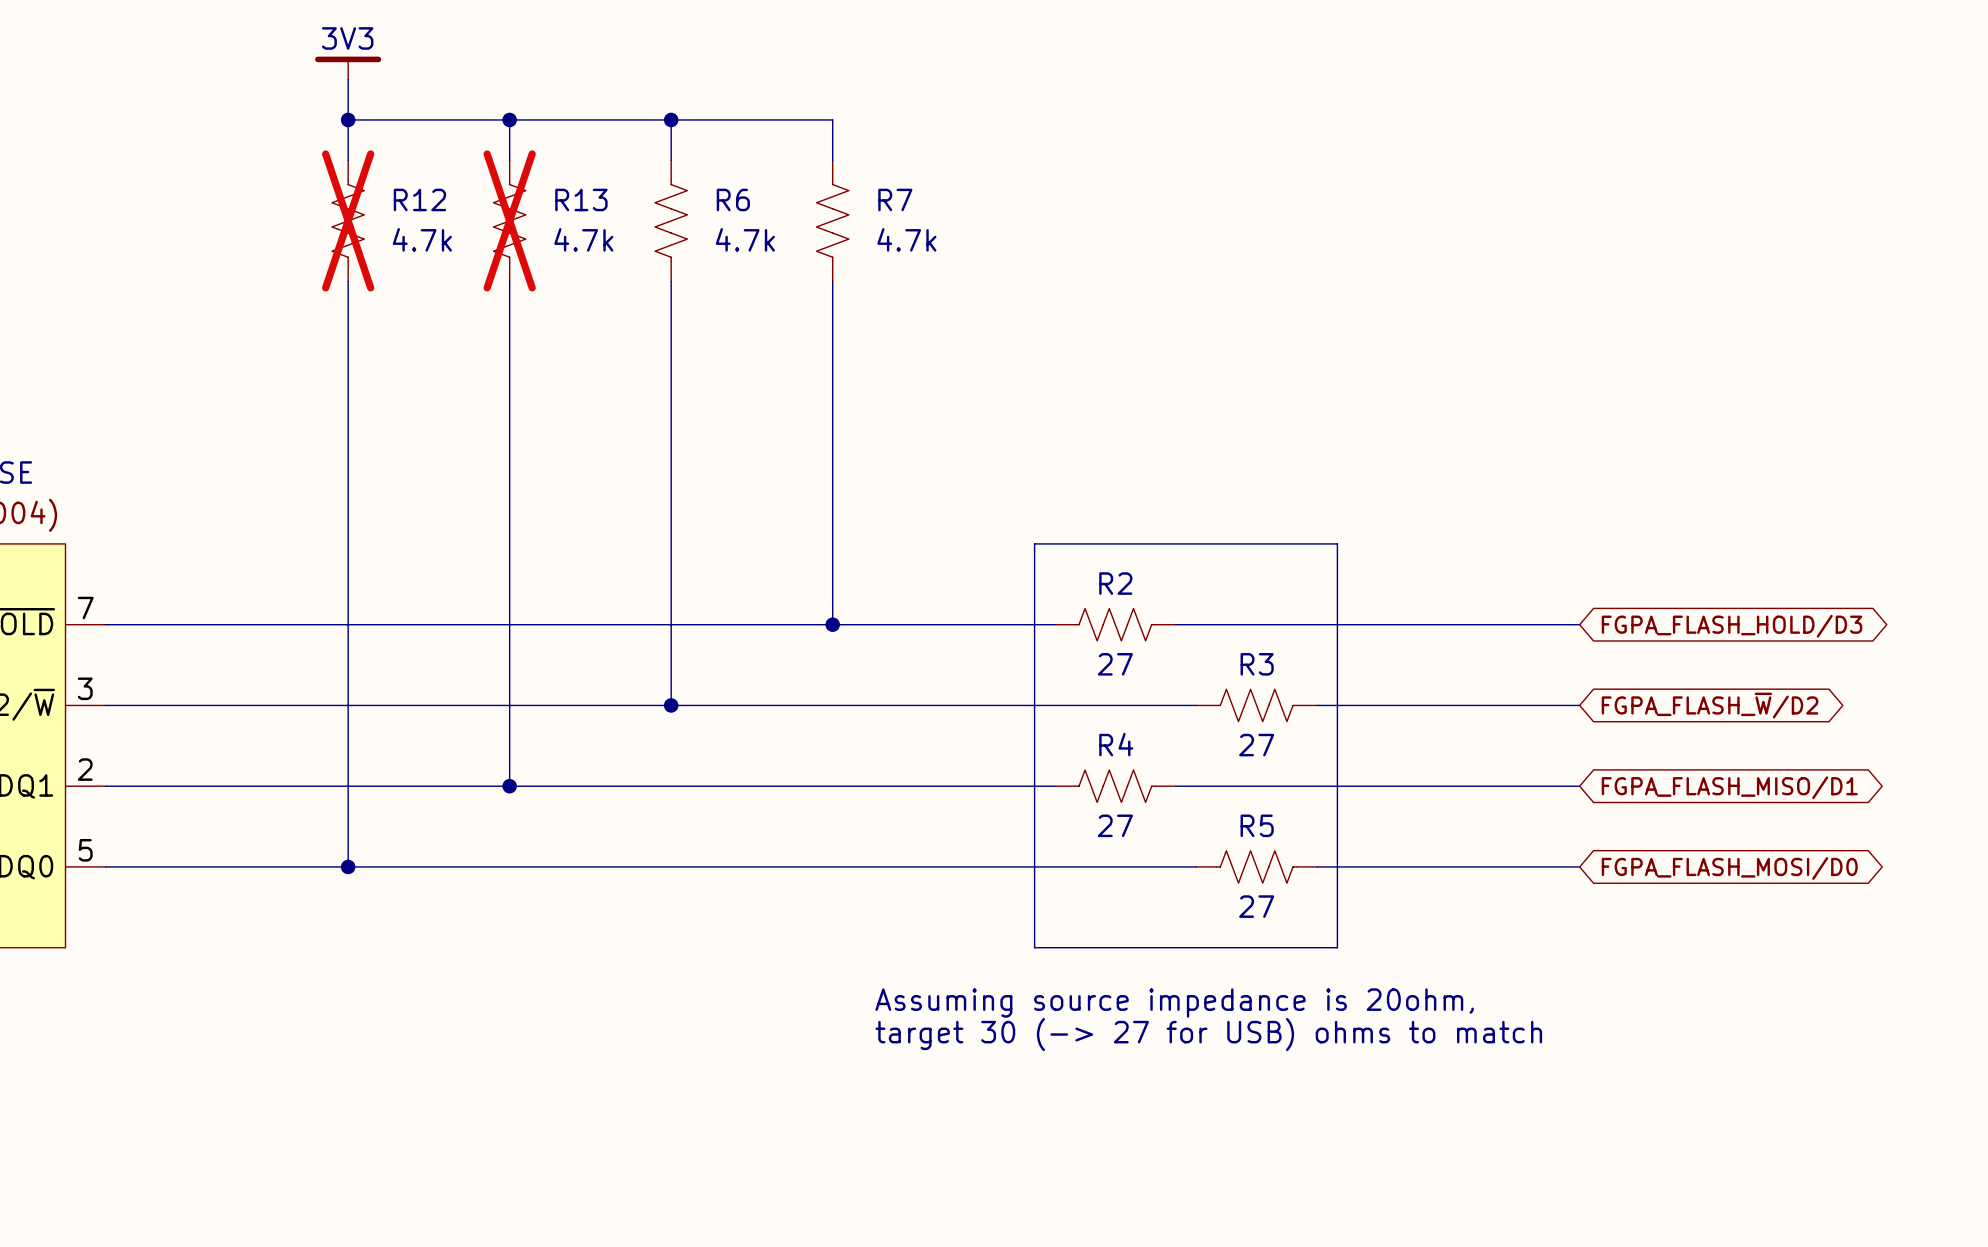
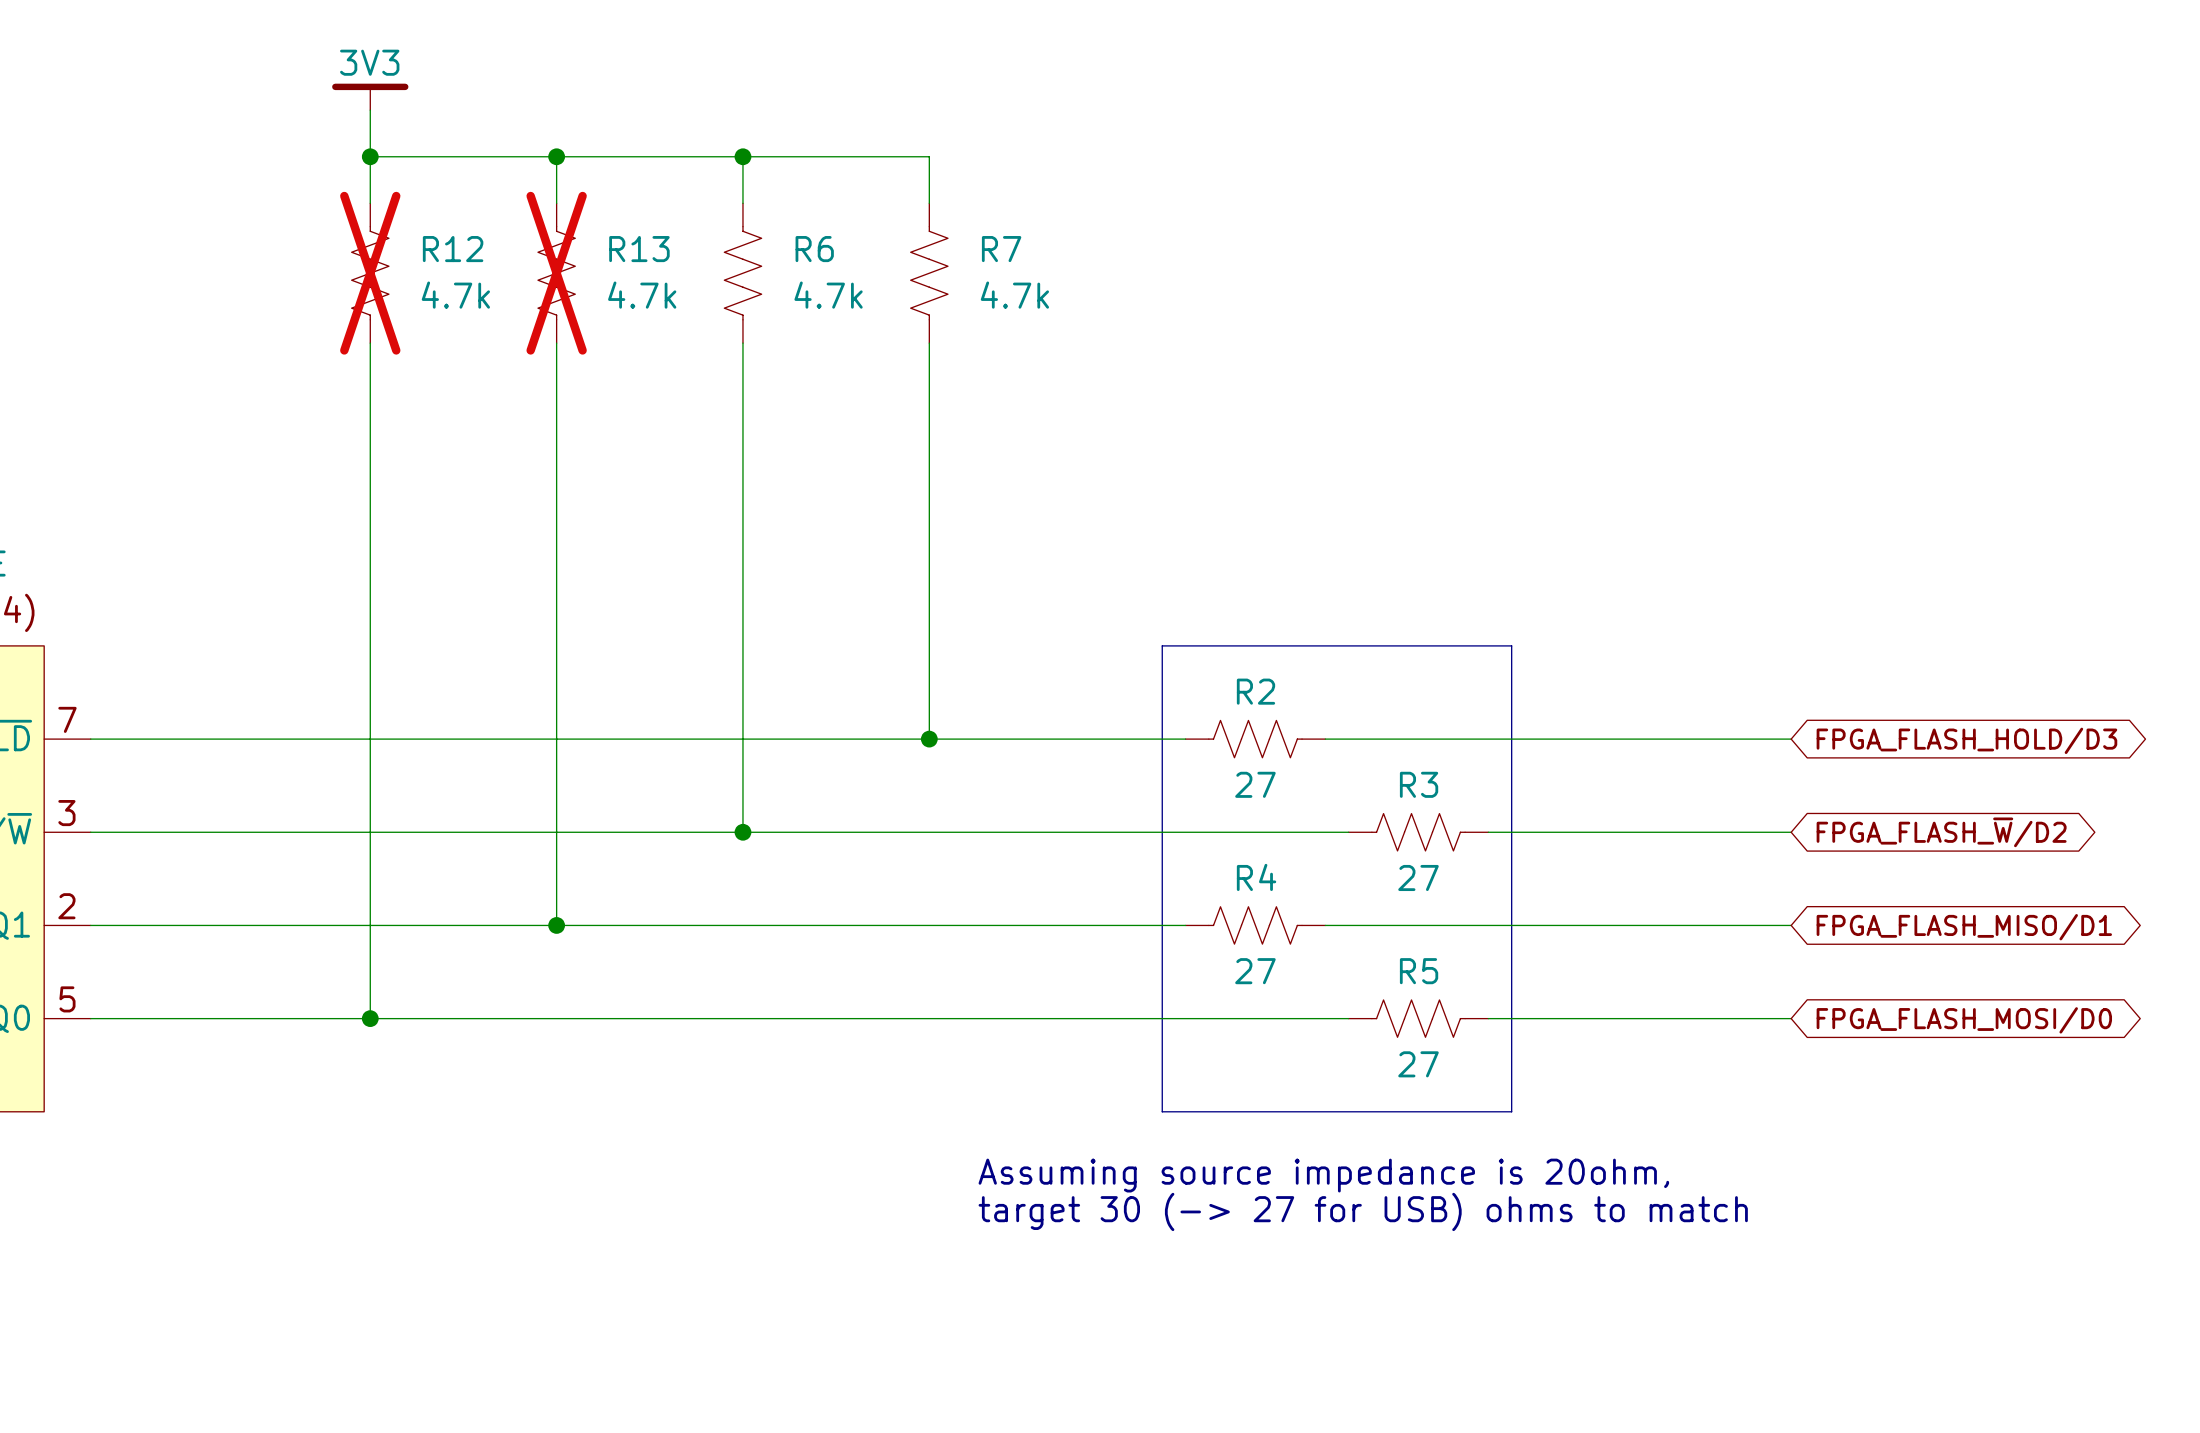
global label: FGPA_FLASH_HOLD/D3 (1732, 626) -> FPGA_FLASH_HOLD/D3 (1966, 740)
global label: FGPA_FLASH_~{W}/D2 (1710, 705) -> FPGA_FLASH_~{W}/D2 (1941, 832)
global label: FGPA_FLASH_MISO/D1 (1729, 787) -> FPGA_FLASH_MISO/D1 (1964, 927)
global label: FGPA_FLASH_MOSI/D0 (1729, 868) -> FPGA_FLASH_MOSI/D0 (1964, 1020)

